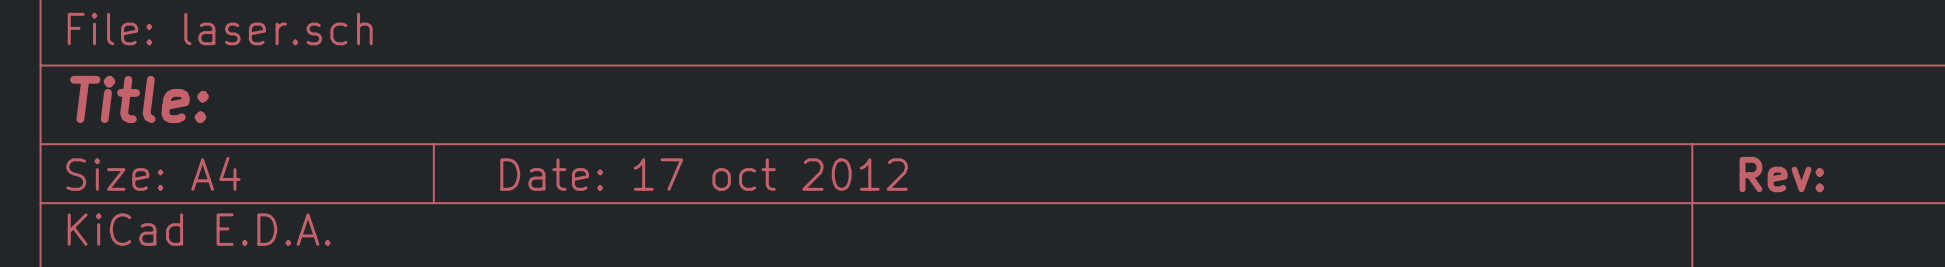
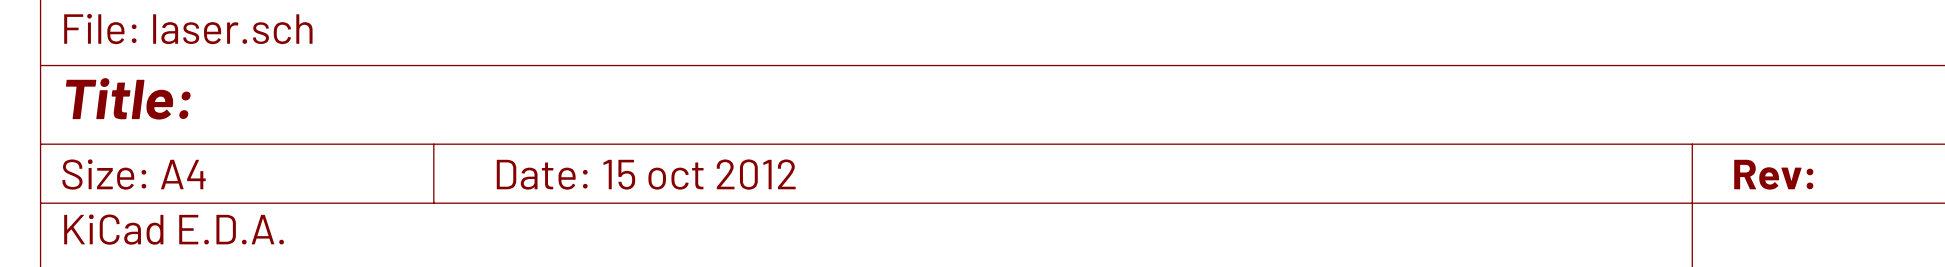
title block: Date: 17 oct 2012 (704, 174) -> Date: 15 oct 2012 (646, 174)

